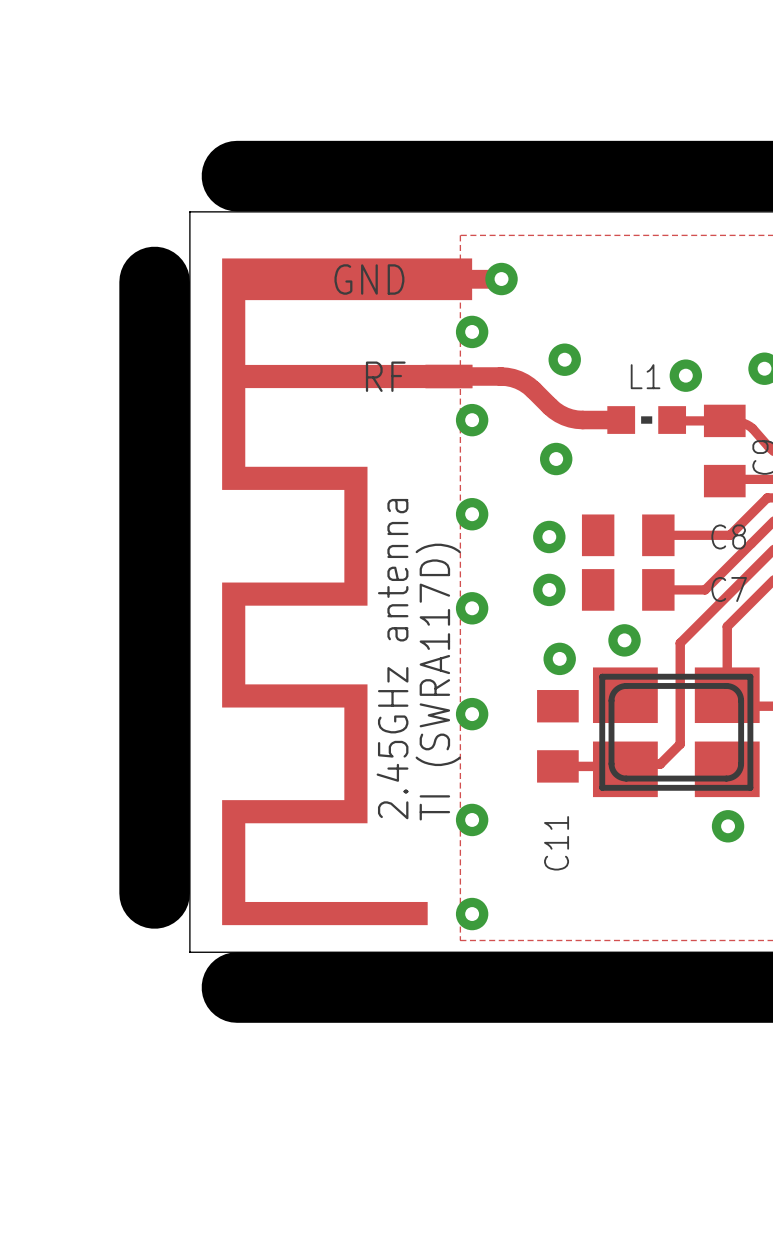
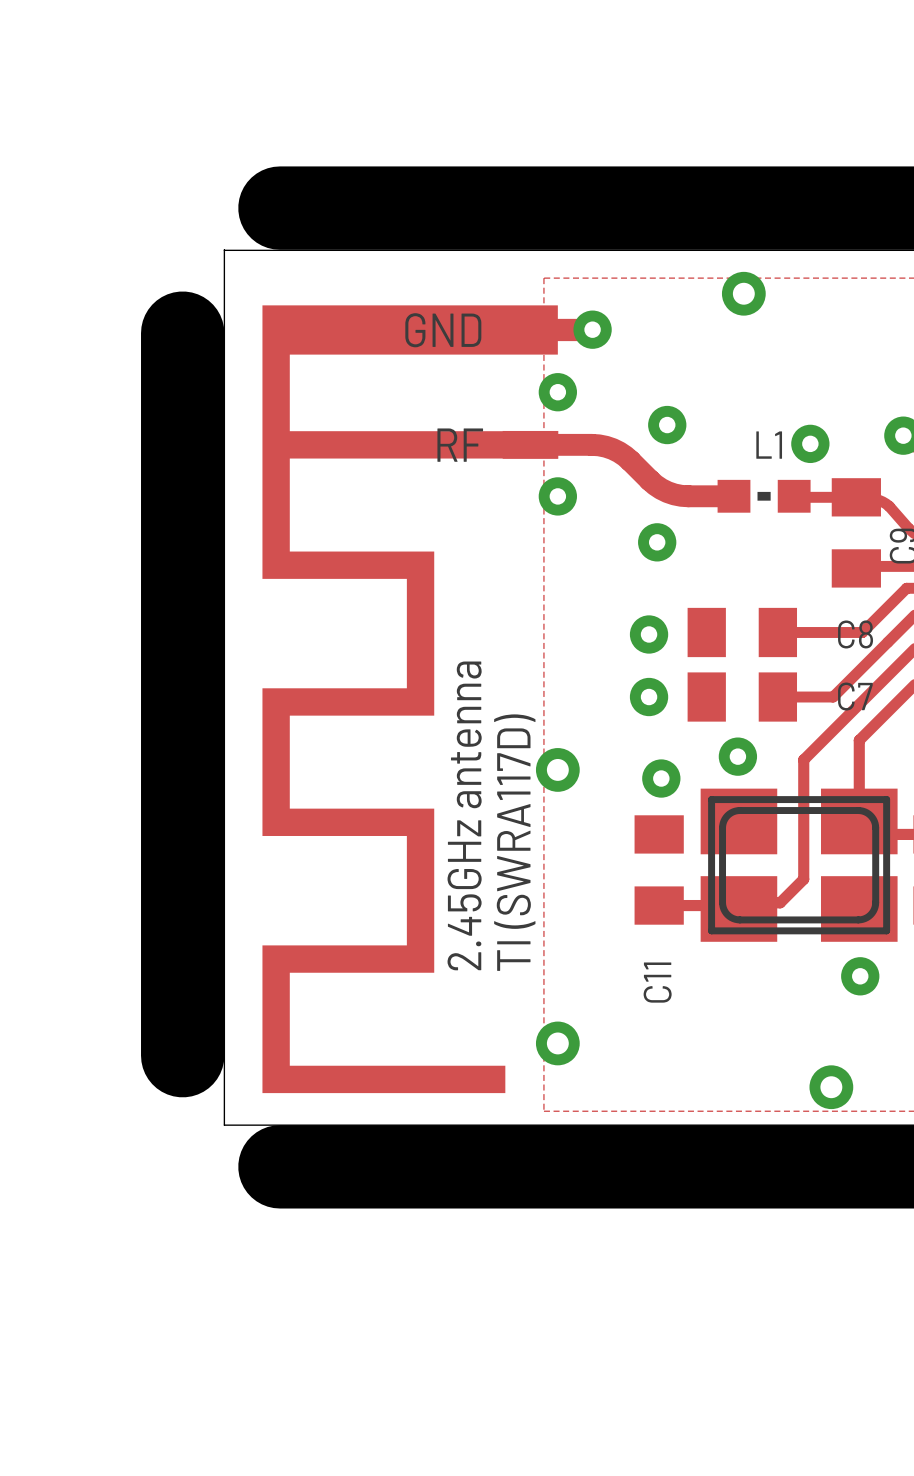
via: none -> (743, 293)
via: (472, 514) -> none
via: (472, 608) -> none
via: none -> (557, 769)
via: (472, 714) -> none
via: (472, 819) -> none
via position: (472, 914) -> (557, 1043)
via: none -> (831, 1087)

